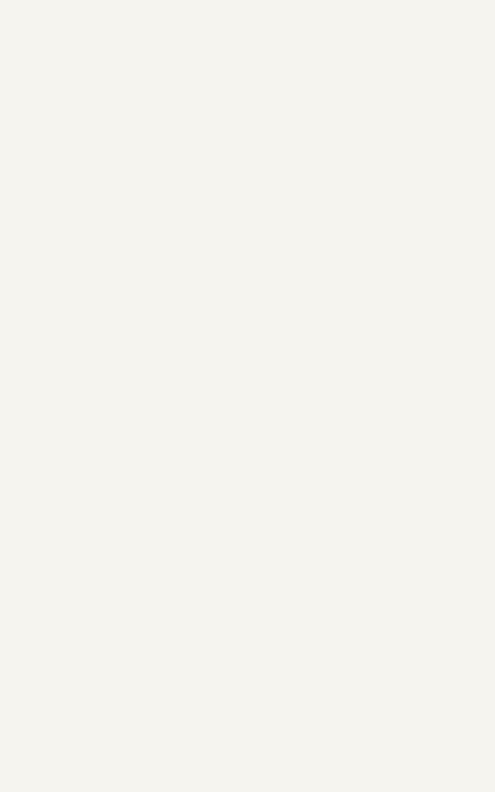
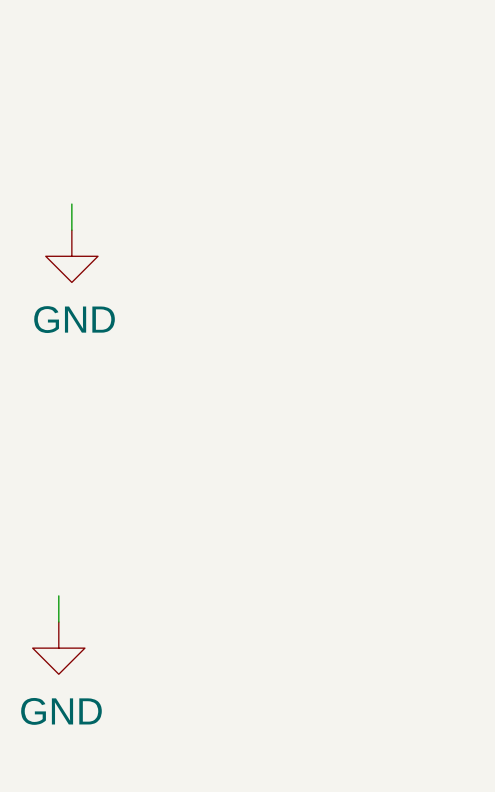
wire: none -> (71, 204) (71, 230)
power symbol: none -> GND (71, 256)
wire: none -> (58, 595) (58, 622)
power symbol: none -> GND (58, 648)

